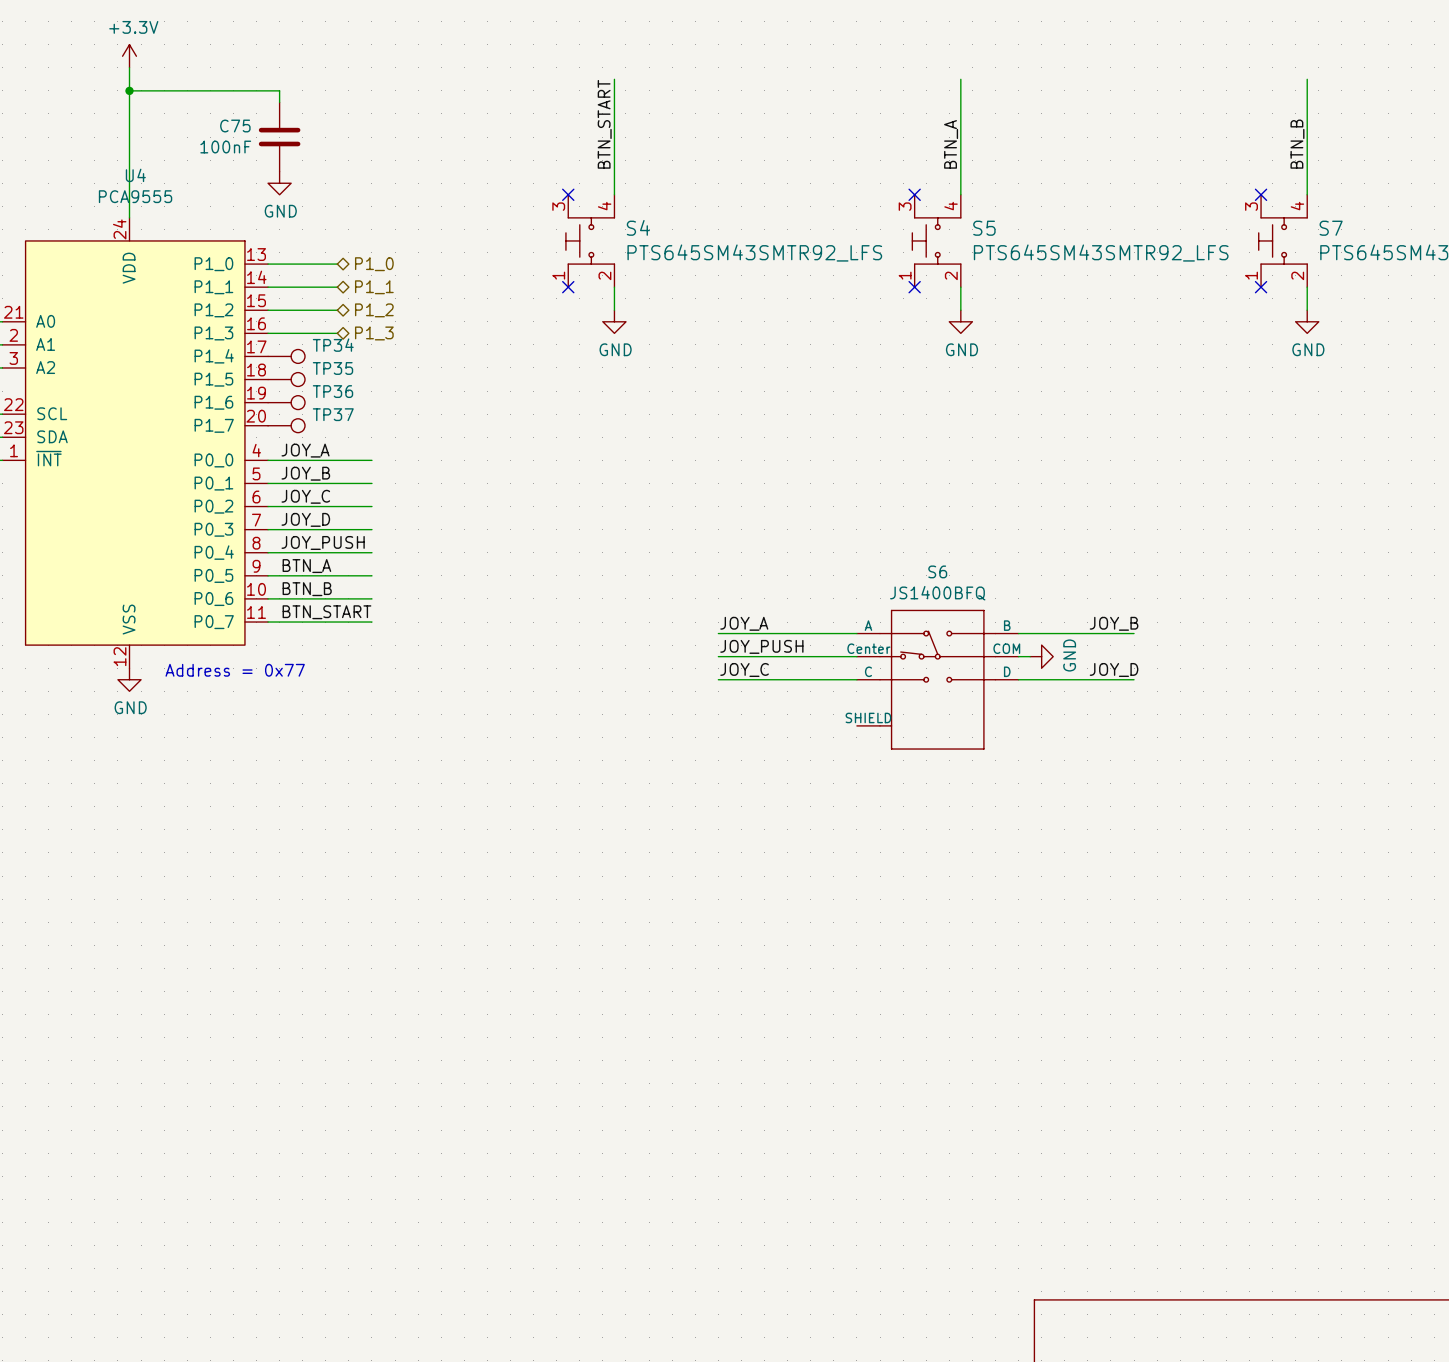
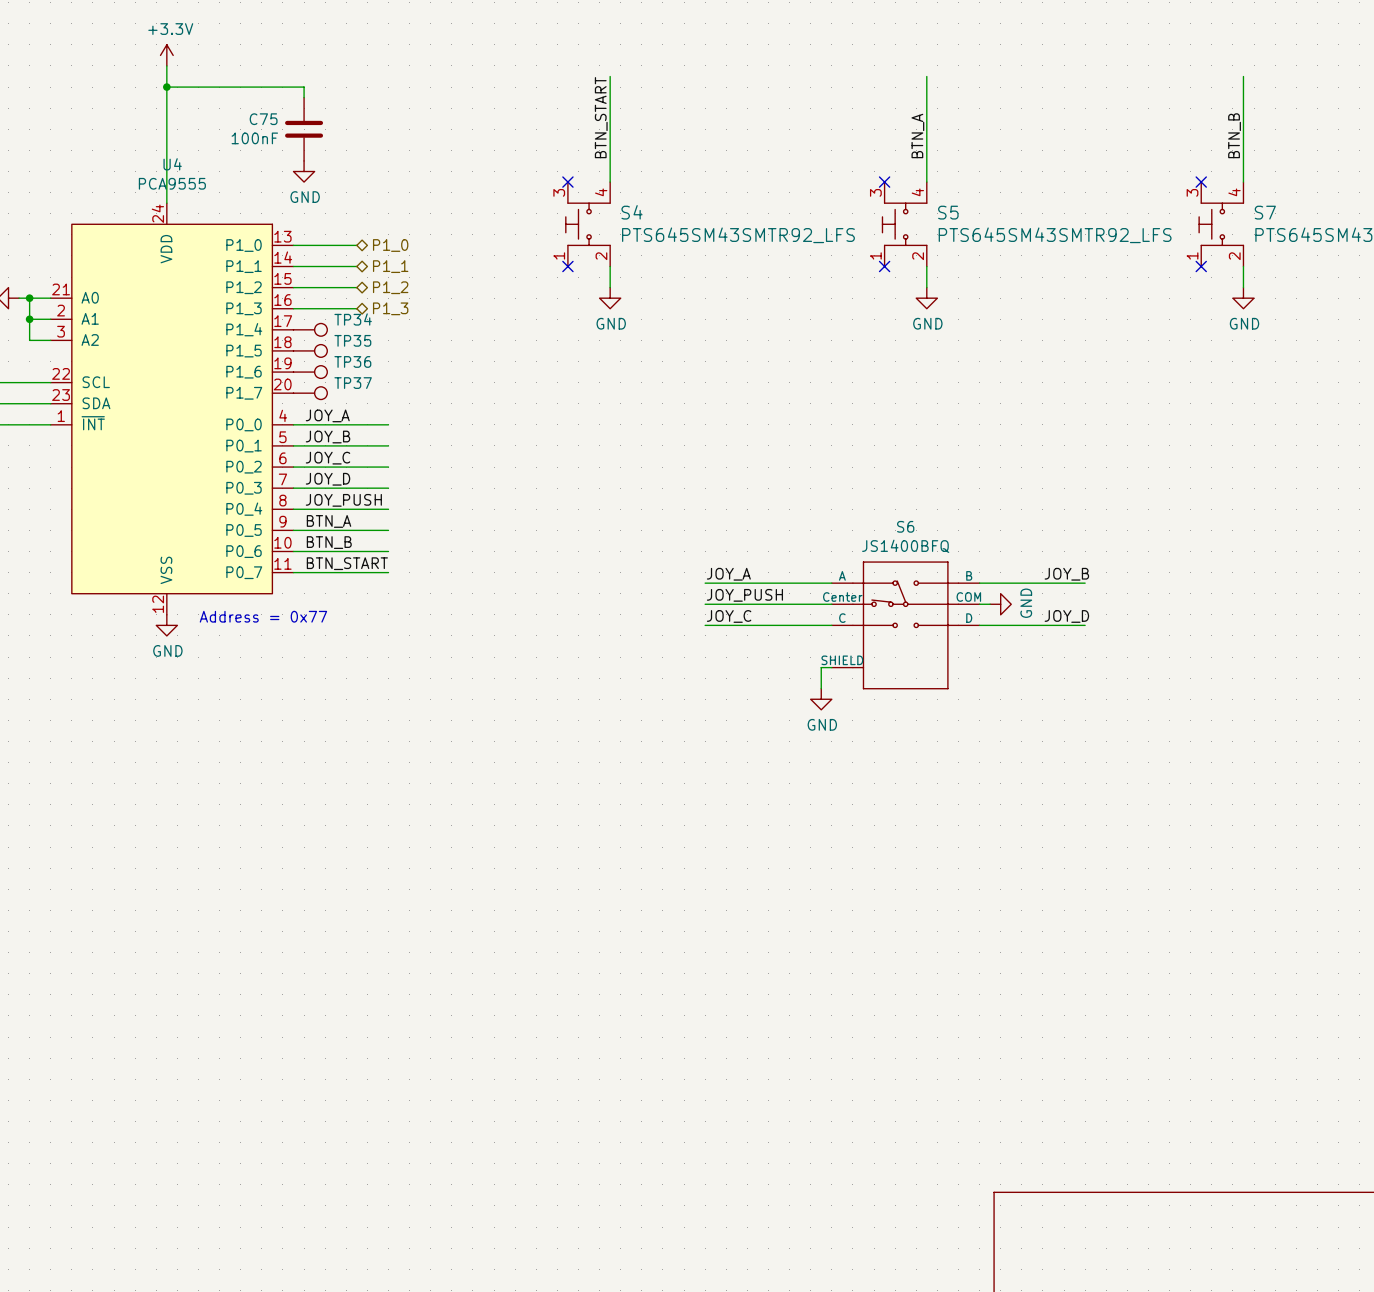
wire: none -> (831, 667) (821, 667) (821, 688)
power symbol: none -> GND (821, 699)

